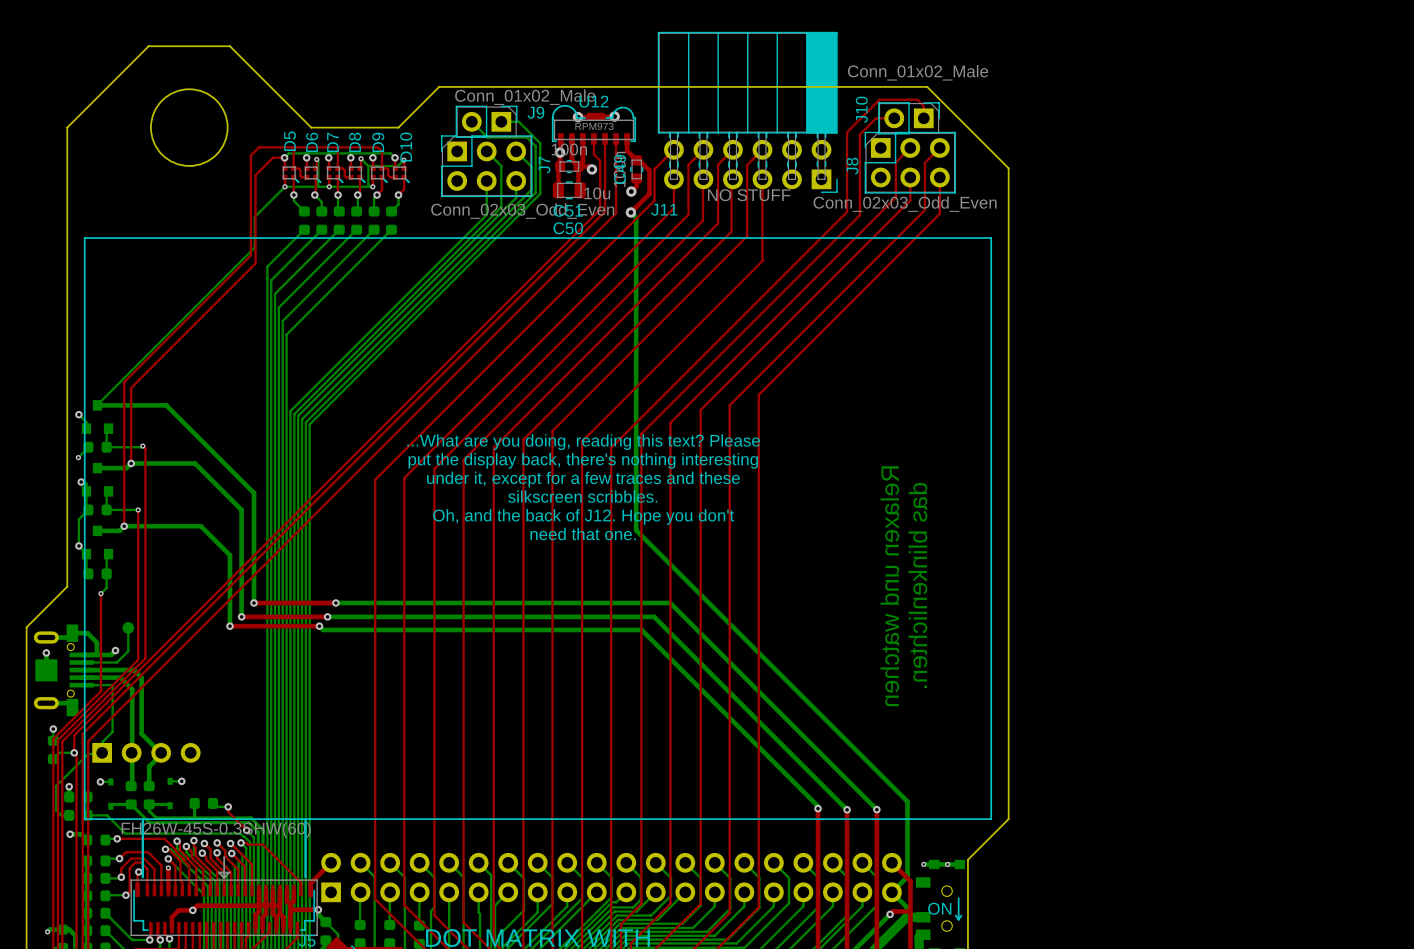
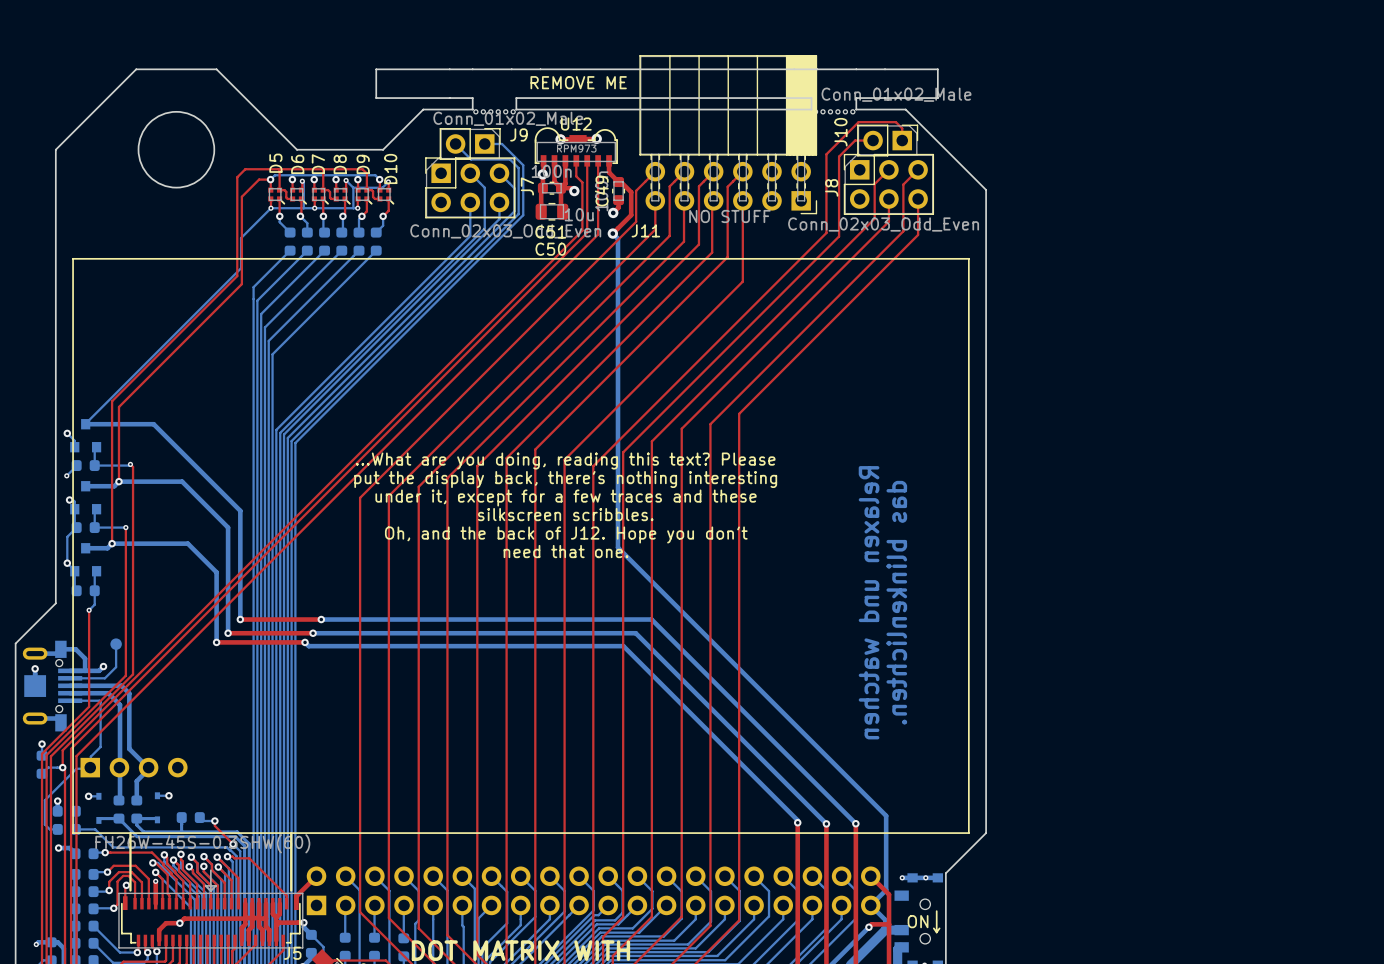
text: none -> REMOVE ME (578, 82)
board edge: (489, 86) (533, 86) -> (811, 109) (811, 98) (516, 98) (516, 109)
board edge: (831, 86) (877, 86) -> (472, 109) (472, 98) (376, 98) (376, 69) (937, 69) (937, 98) (856, 98) (856, 109)
part: none -> (494, 111)
part: none -> (834, 111)

